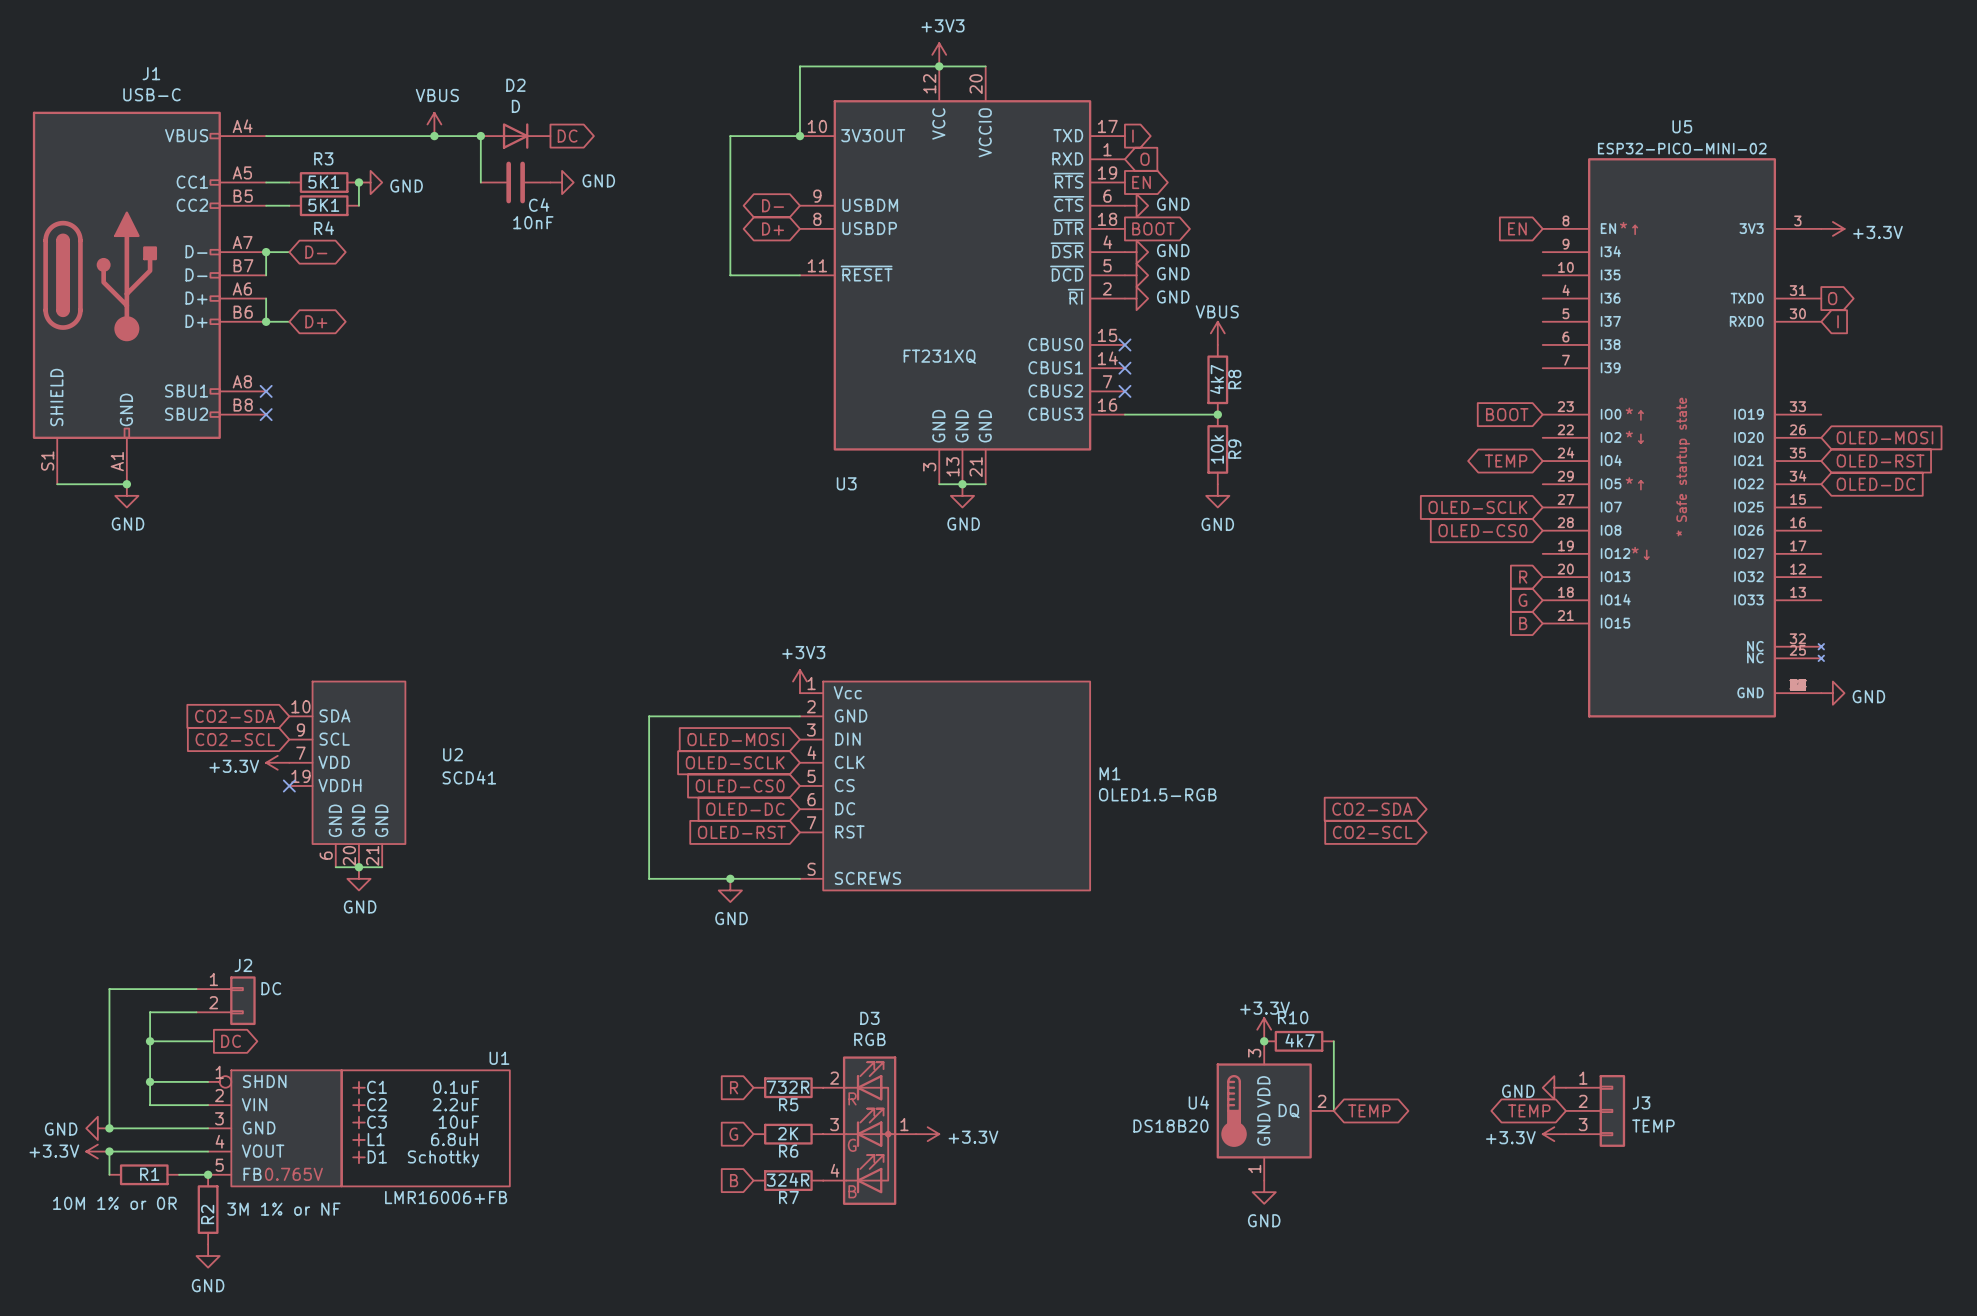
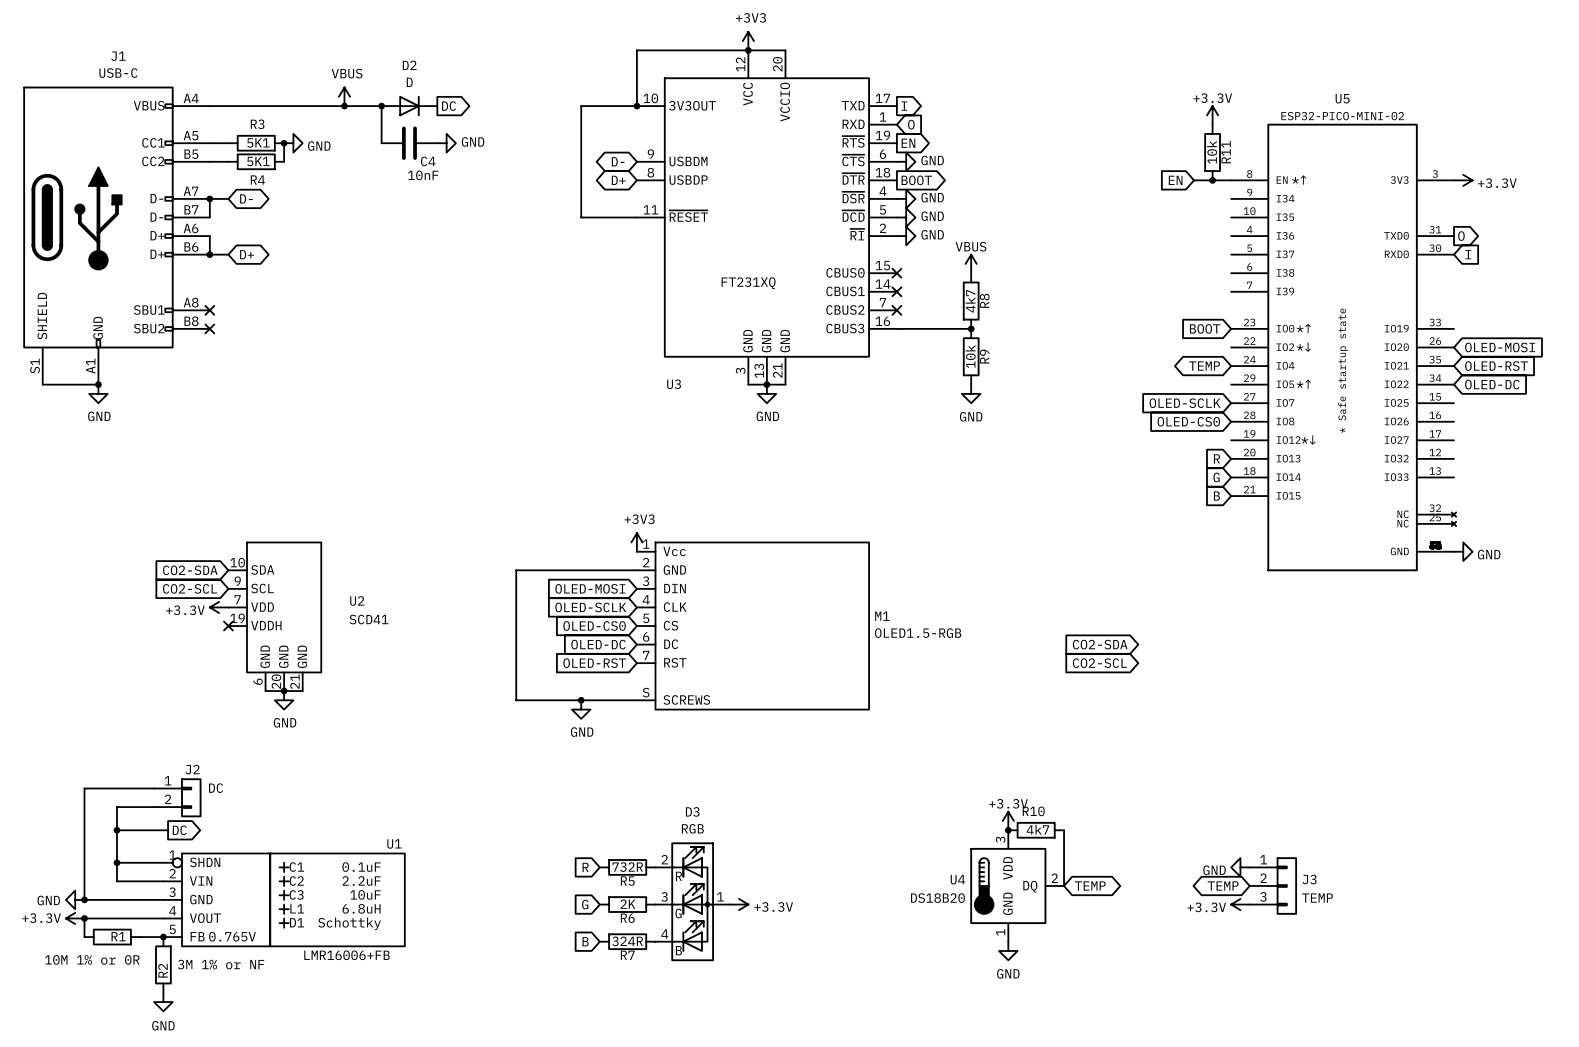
power symbol: none -> +3.3V (1212, 115)
R11: none -> 10k (1212, 152)
wire: none -> (1194, 180) (1231, 180)
global label position: EN (1517, 228) -> EN (1175, 180)
junction: none -> (1212, 180)

